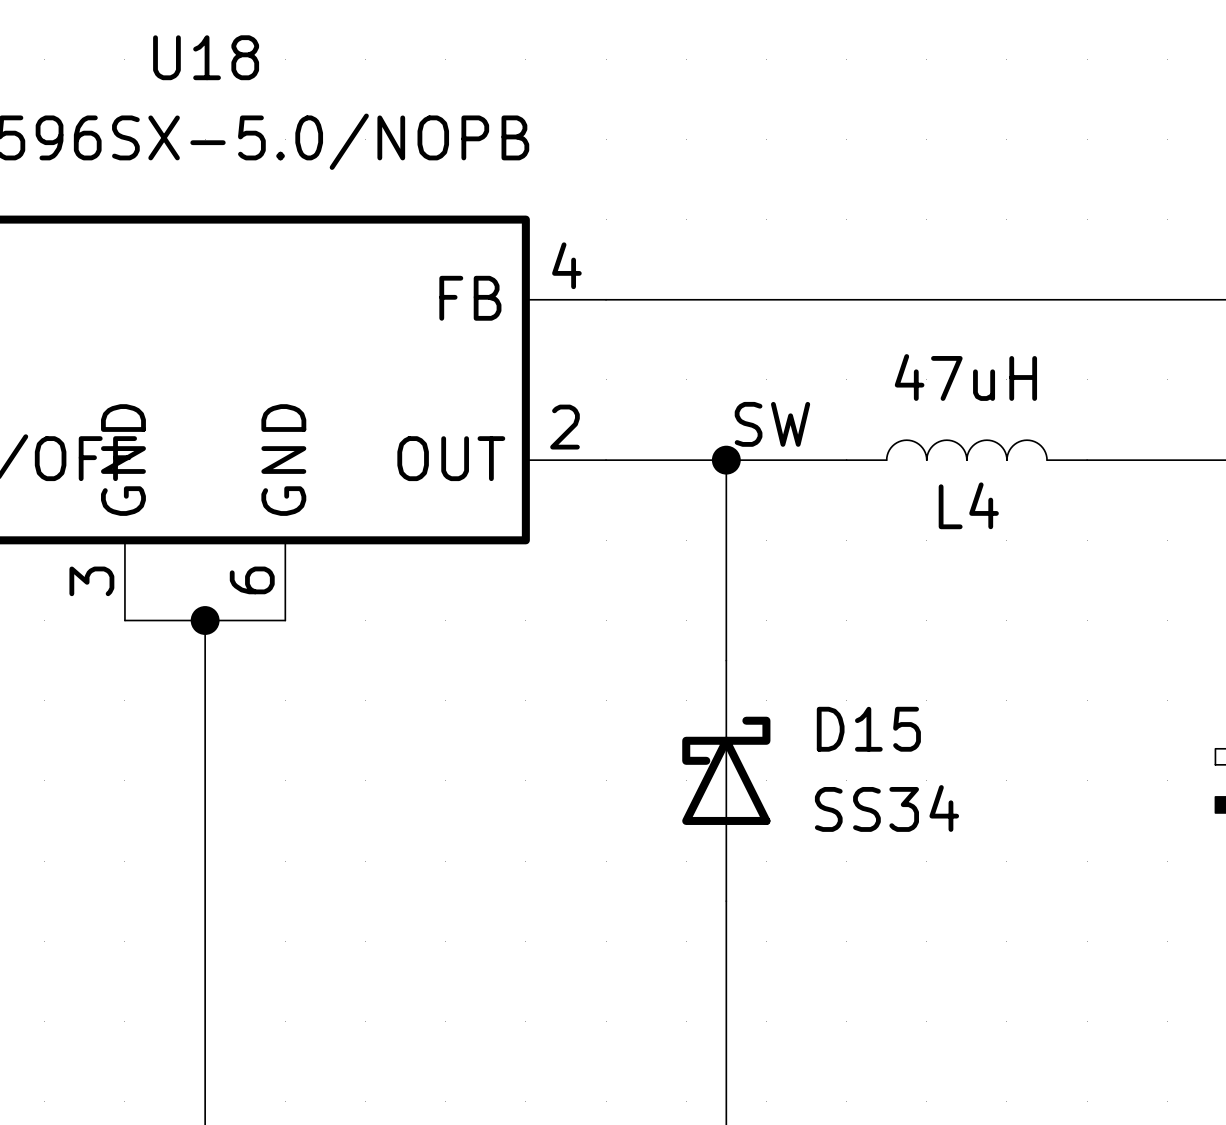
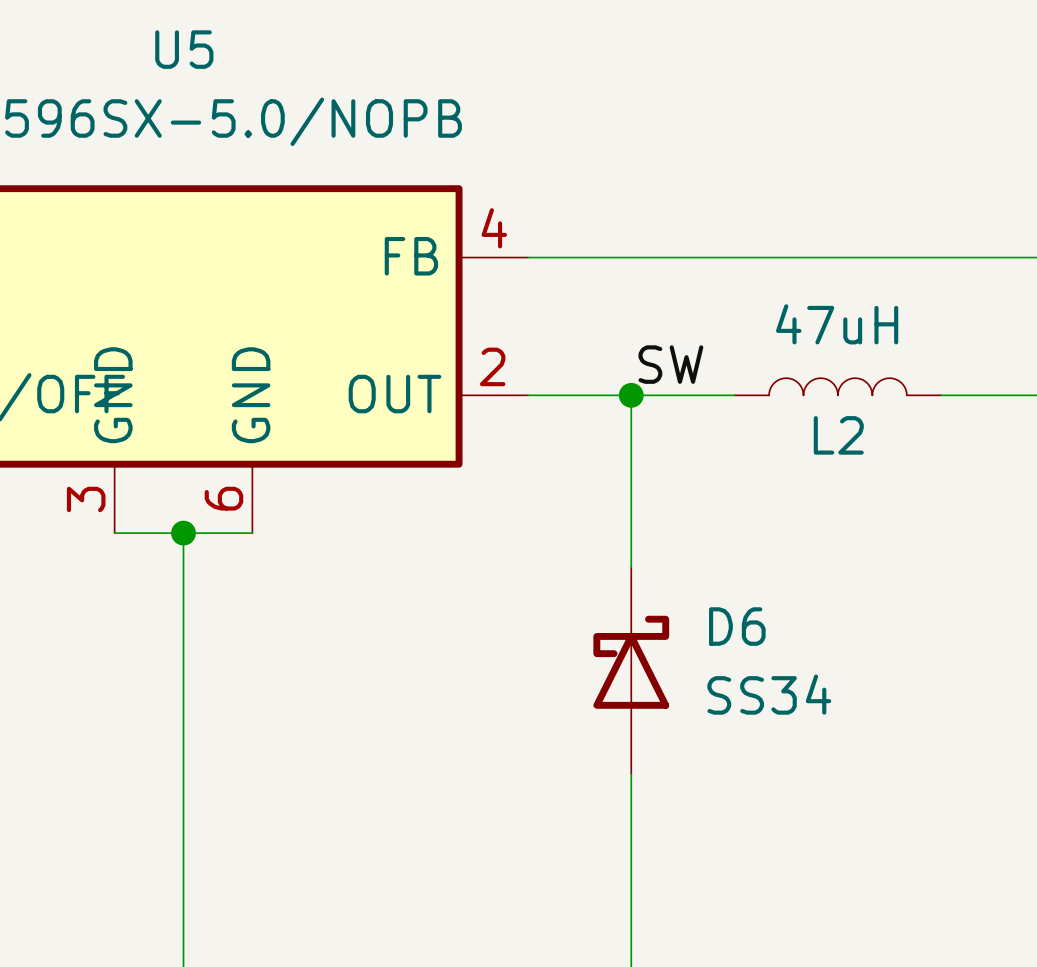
U18 name: U18 (206, 57) -> U5 (184, 49)
L4 name: L4 (968, 505) -> L2 (838, 435)
D15 name: D15 (868, 729) -> D6 (737, 626)

